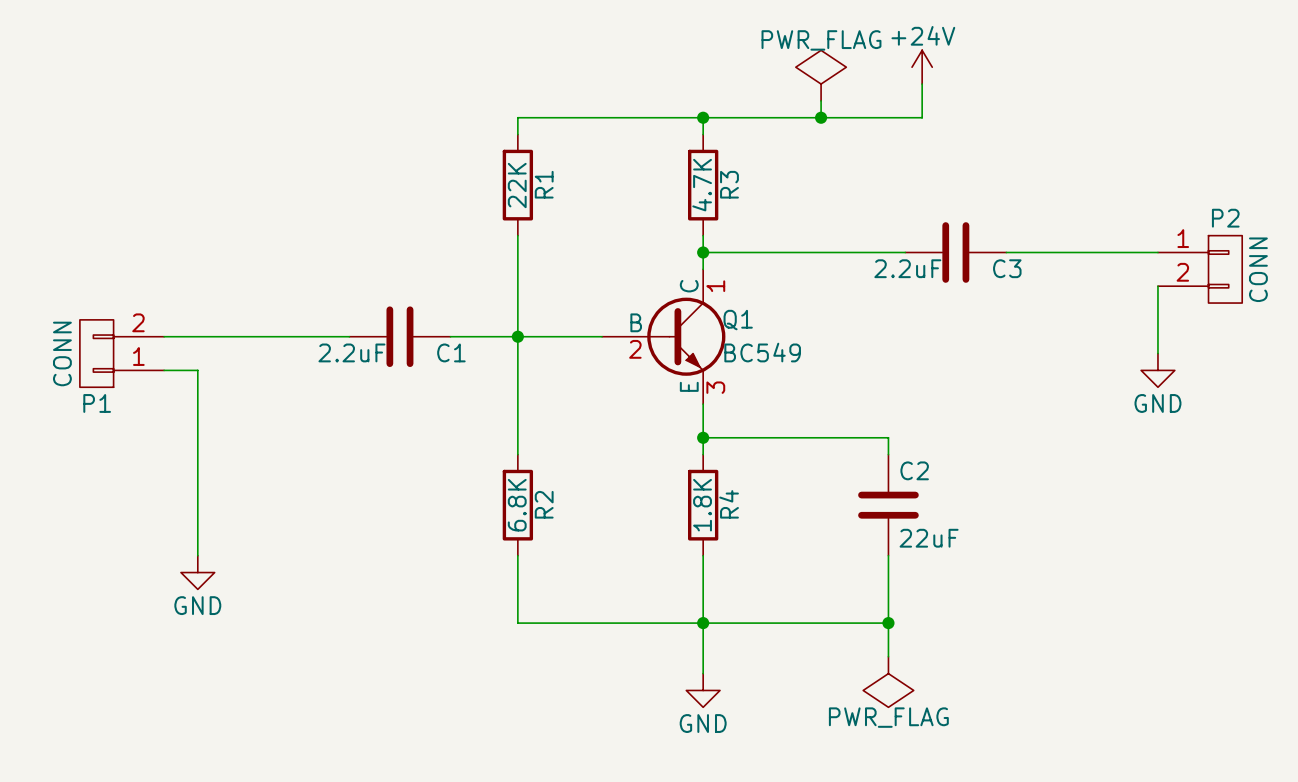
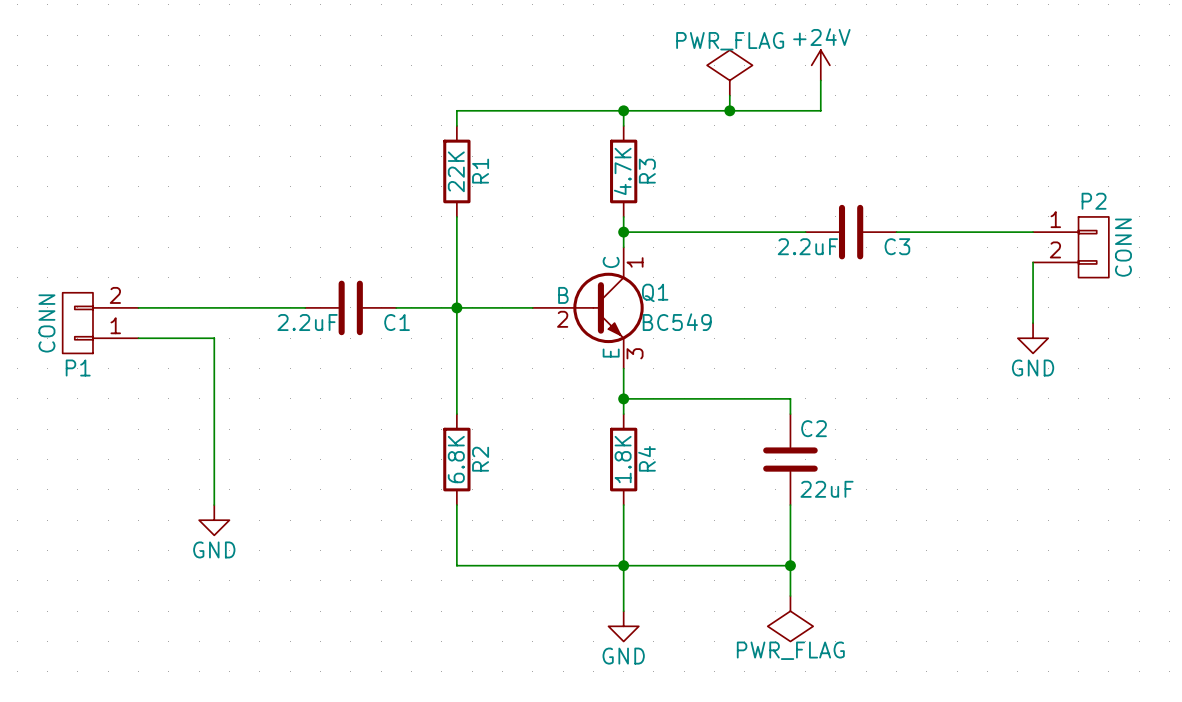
wire: (197, 370) (197, 555) -> (168, 338) (214, 338) (214, 505)
power symbol position: GND (197, 572) -> GND (214, 520)

